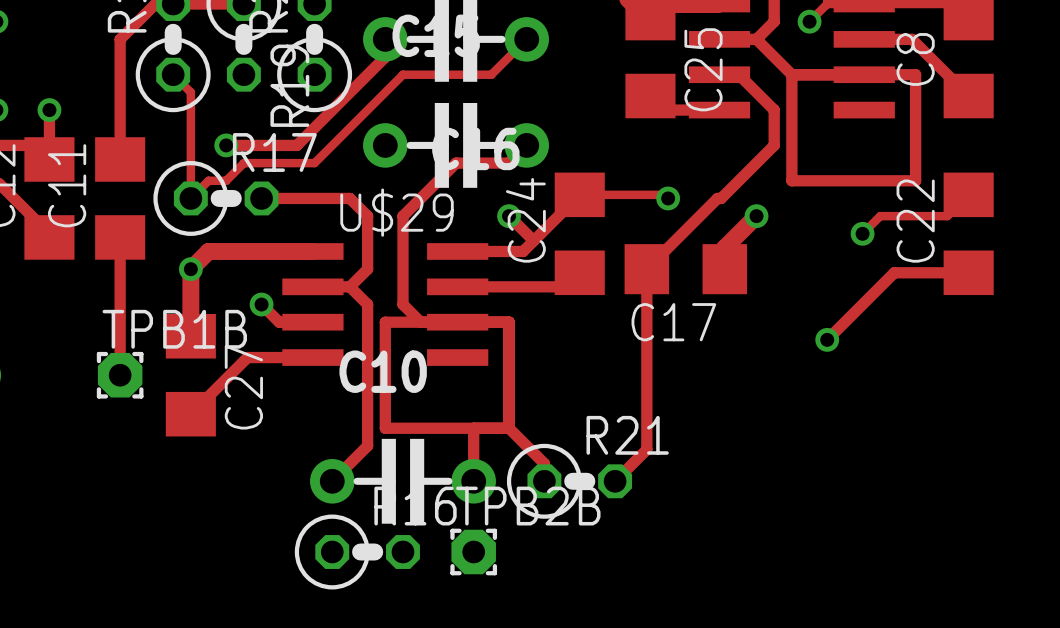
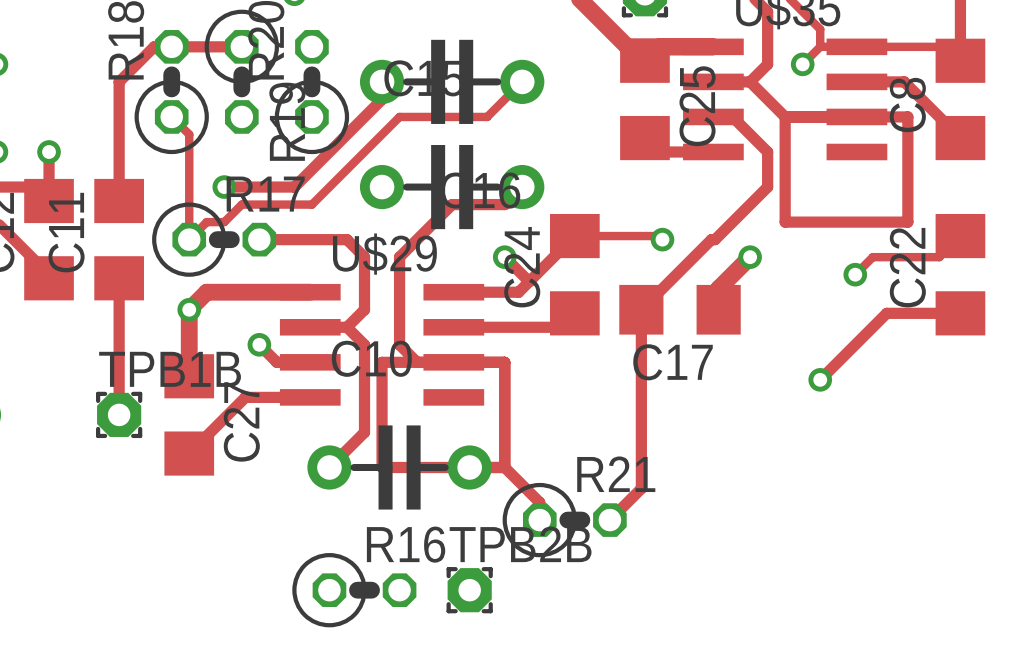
track: (367, 392) (367, 445) (332, 481) -> (364, 432) (329, 467)
track: (473, 428) (473, 481) -> none
C10 position: (402, 481) -> (399, 467)

